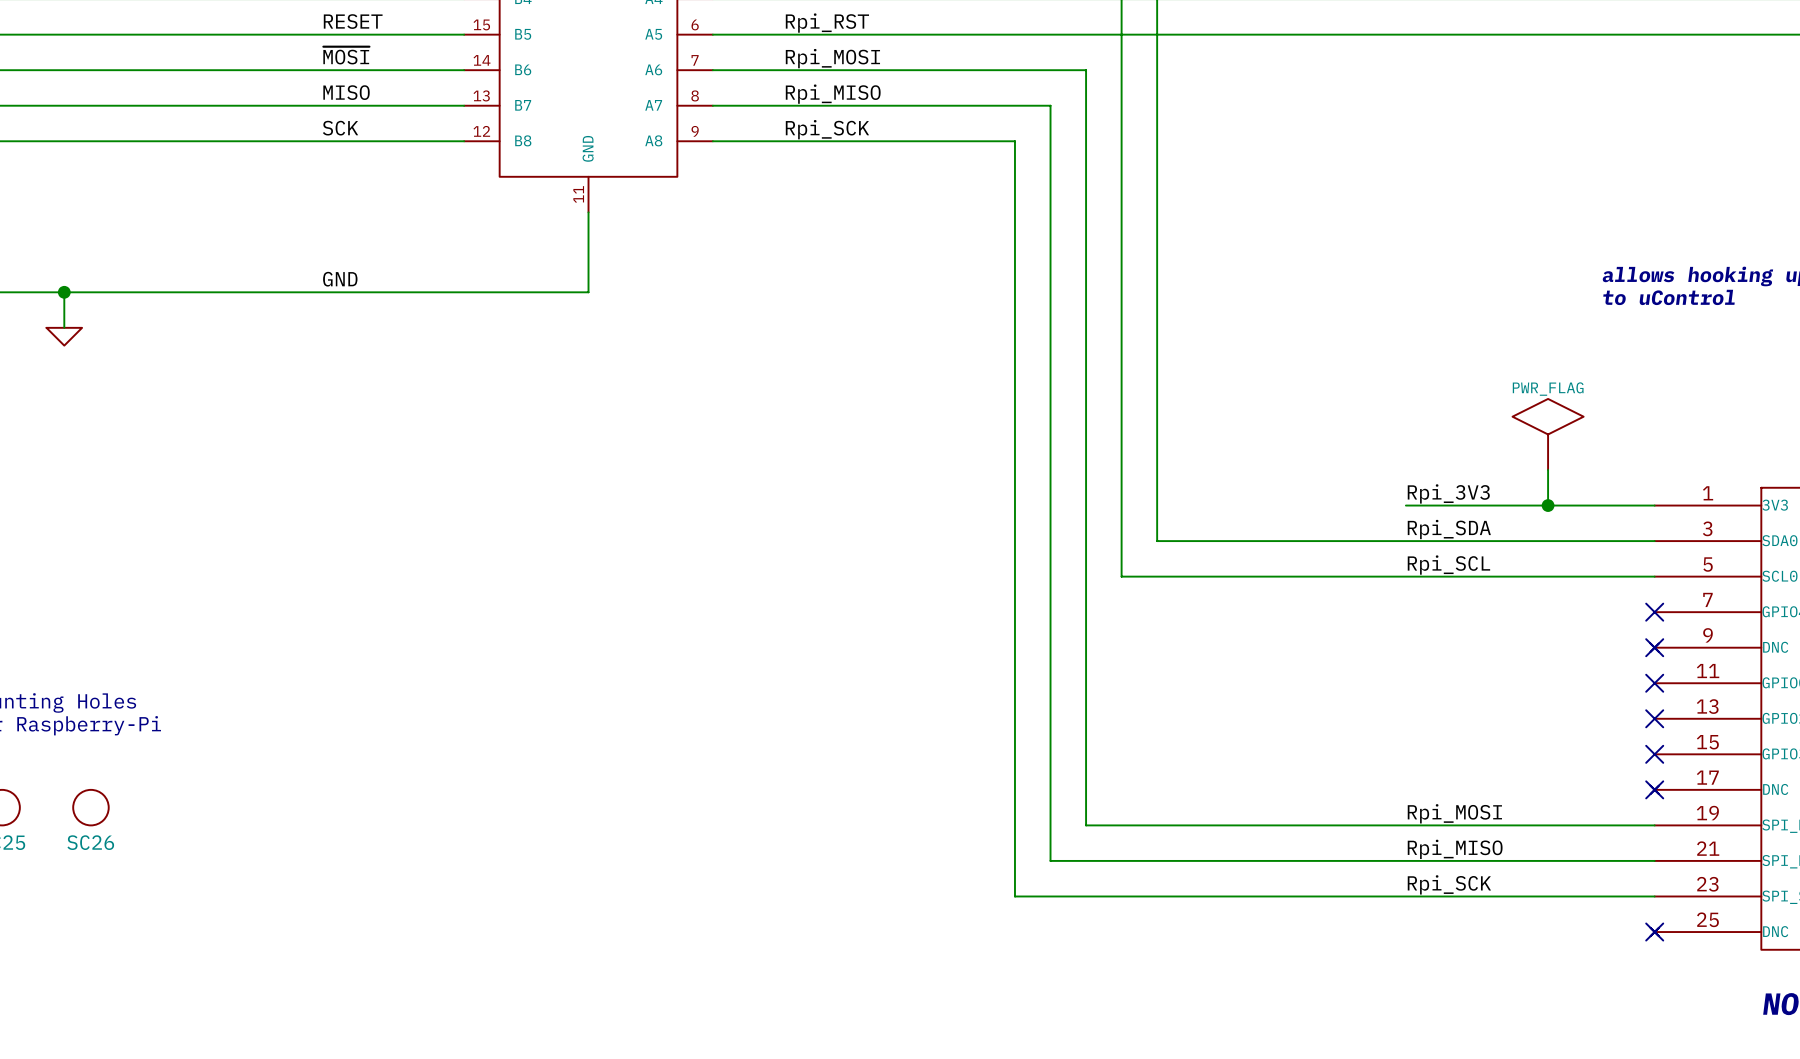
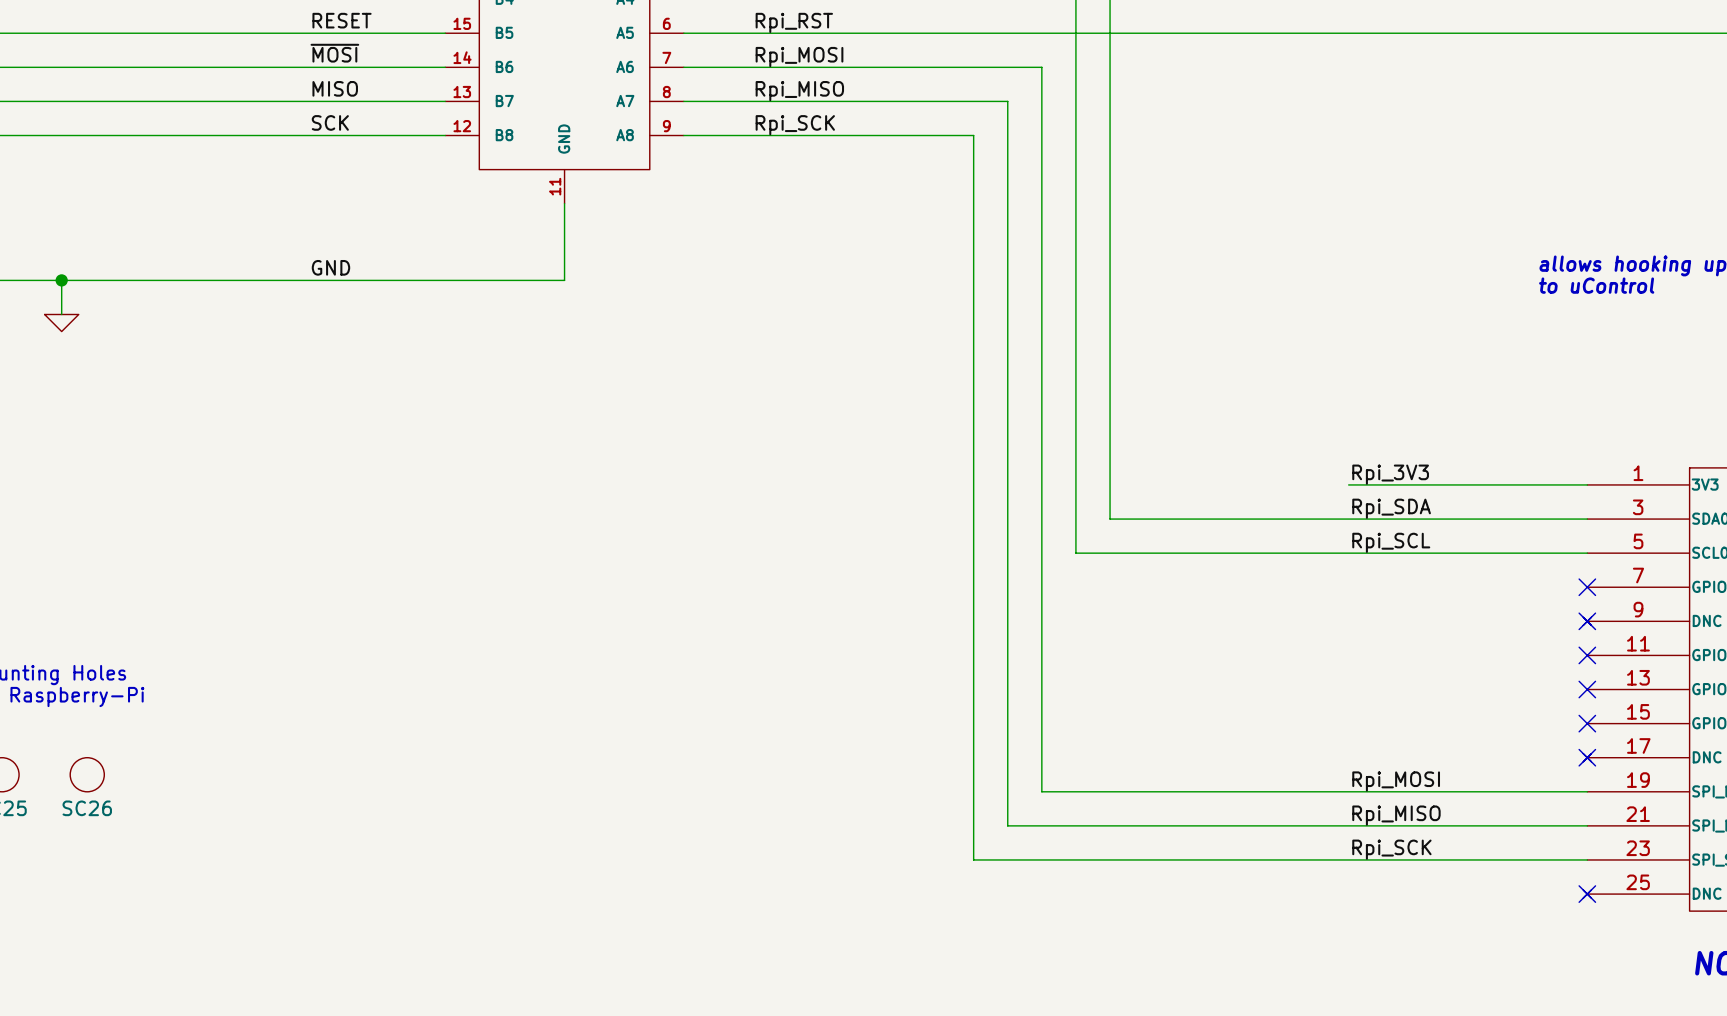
power symbol: PWR_FLAG (1548, 434) -> none
wire: (1548, 470) (1548, 505) -> none
junction: (1548, 505) -> none

